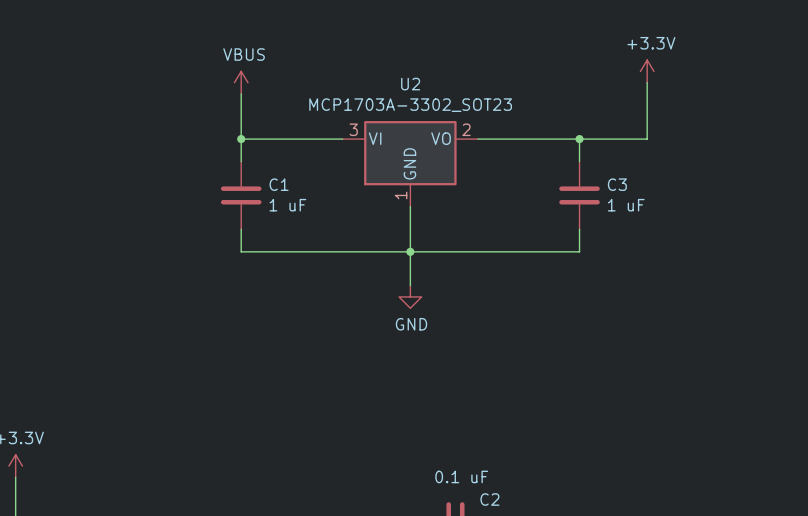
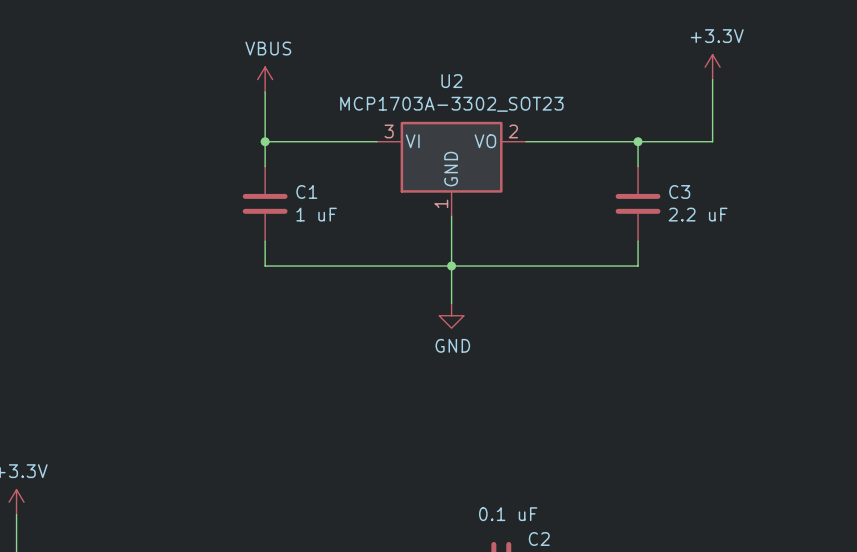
C3 value: 1 uF (626, 205) -> 2.2 uF (698, 214)

